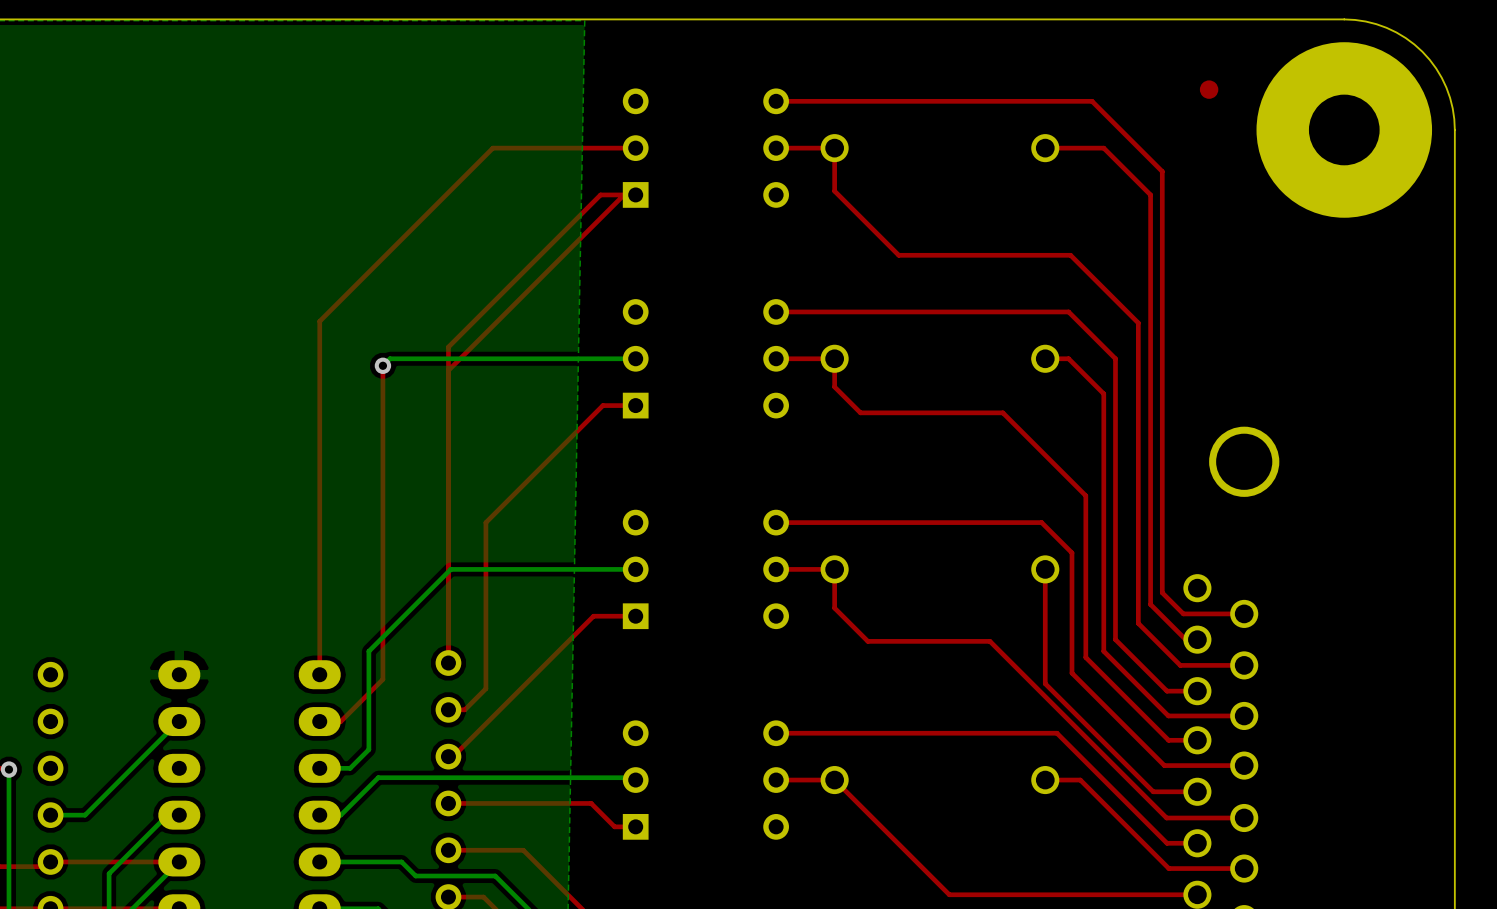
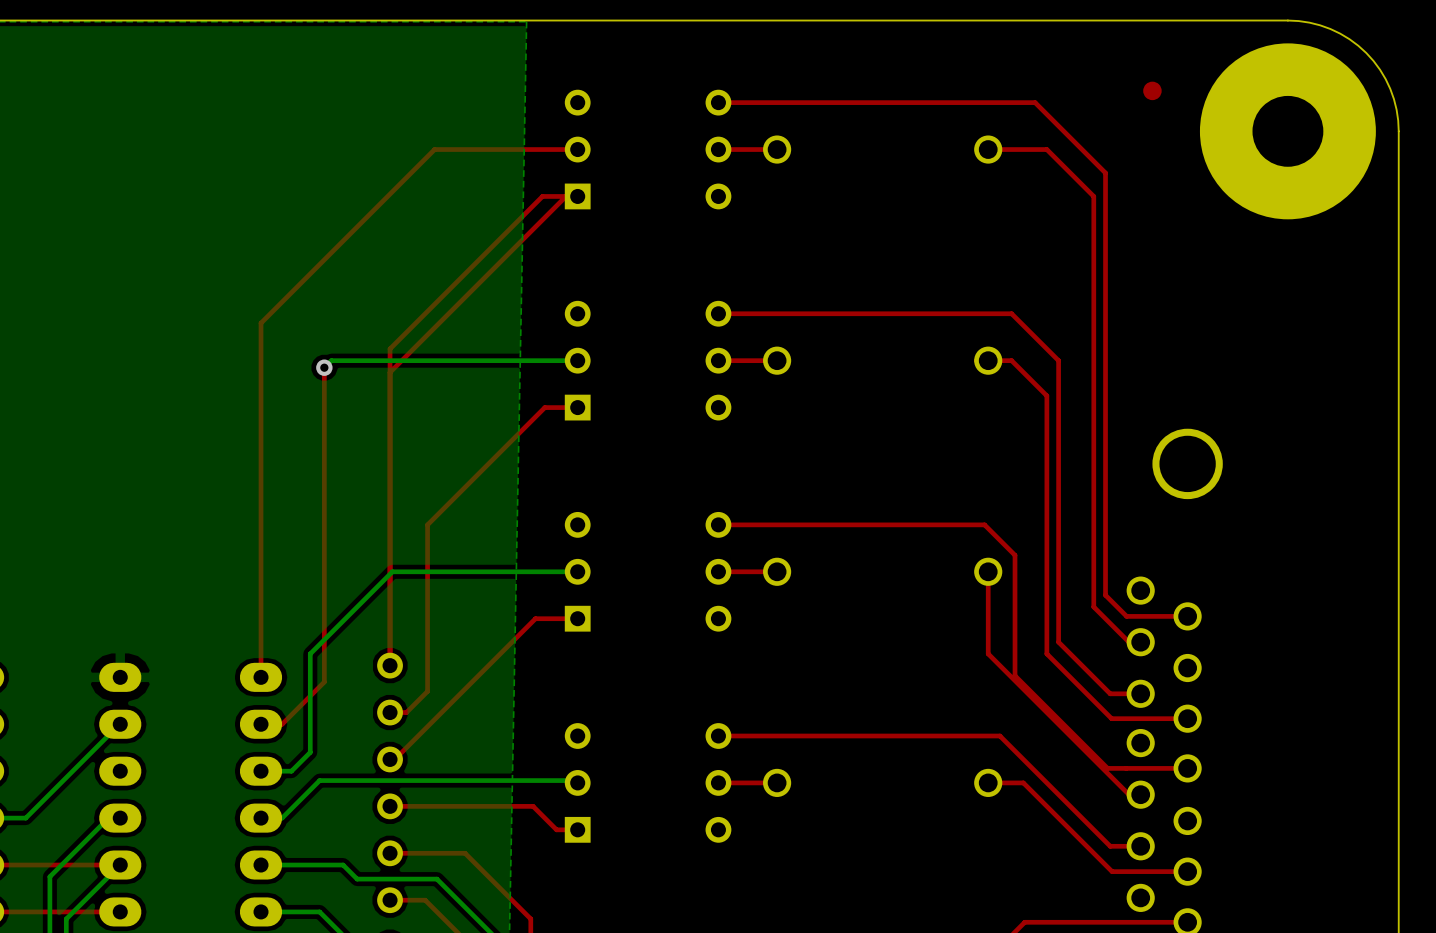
top track: (834, 148) (834, 191) (898, 255) (1070, 255) (1138, 323) (1138, 623) (1180, 665) (1244, 665) -> none
top track: (834, 358) (834, 386) (860, 412) (1002, 412) (1085, 495) (1085, 657) (1168, 740) (1197, 740) -> none
top track: (834, 569) (834, 608) (867, 641) (989, 641) (1166, 818) (1244, 818) -> none
top track: (1045, 651) (1045, 683) (1153, 791) (1185, 791) -> (988, 653) (1129, 794)
top track: (834, 780) (949, 894) (1197, 894) -> none

